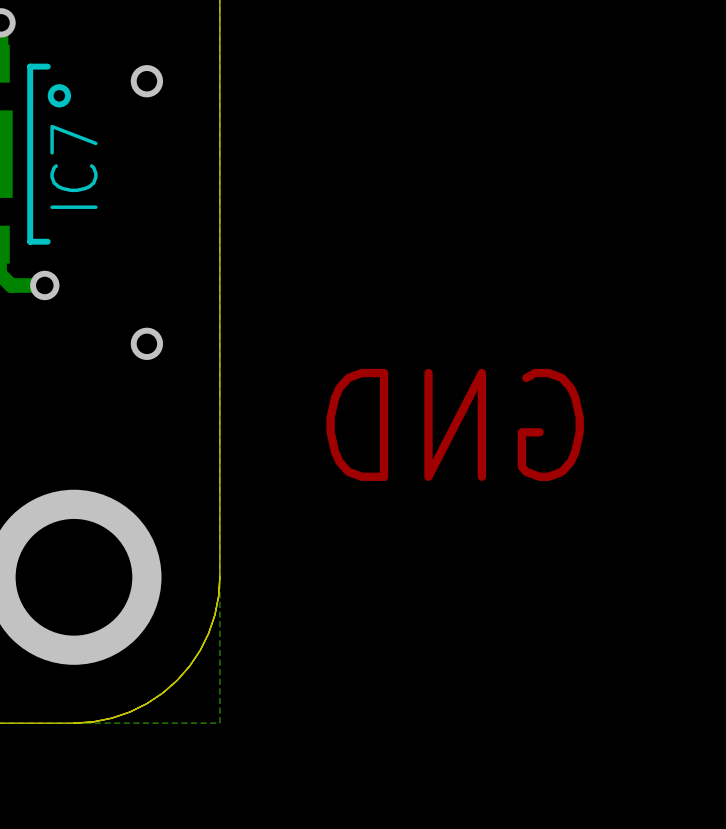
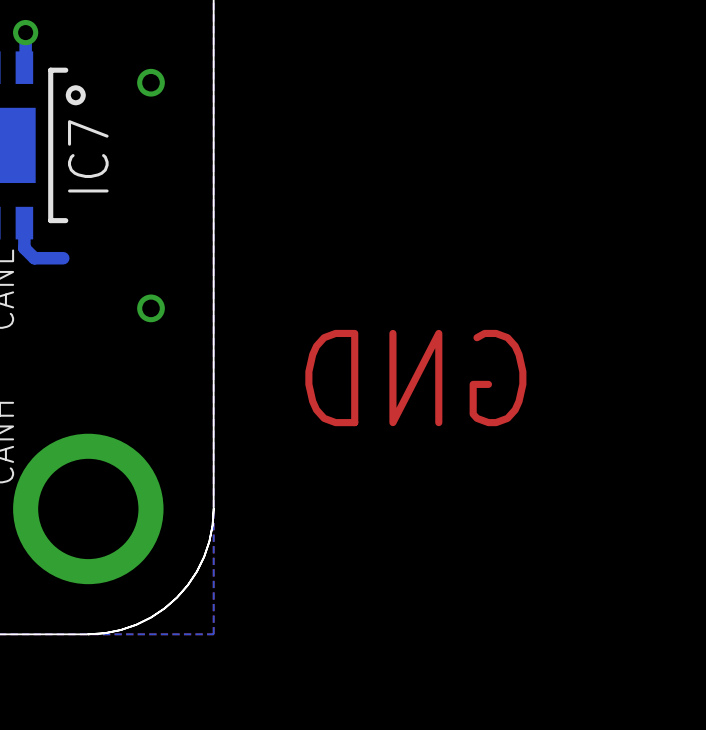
via: (44, 285) -> none

